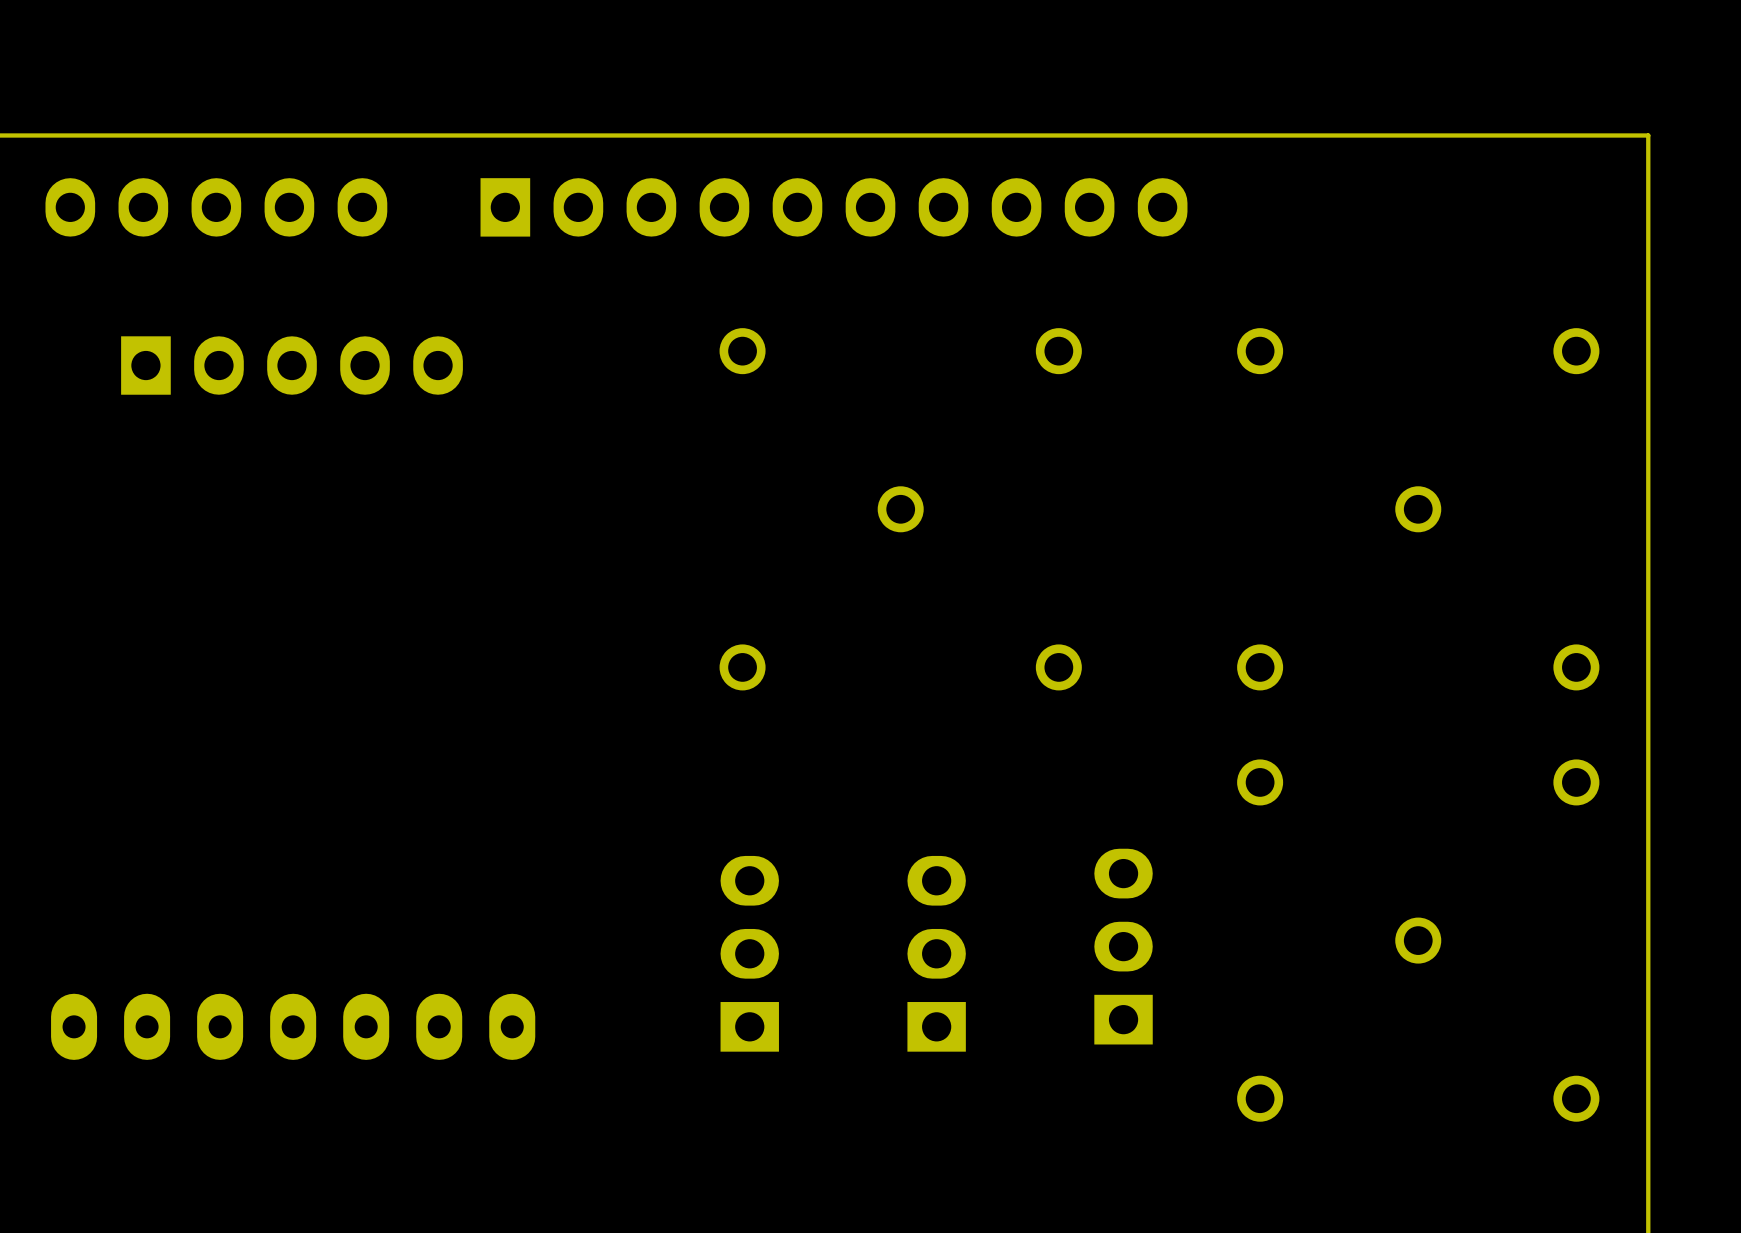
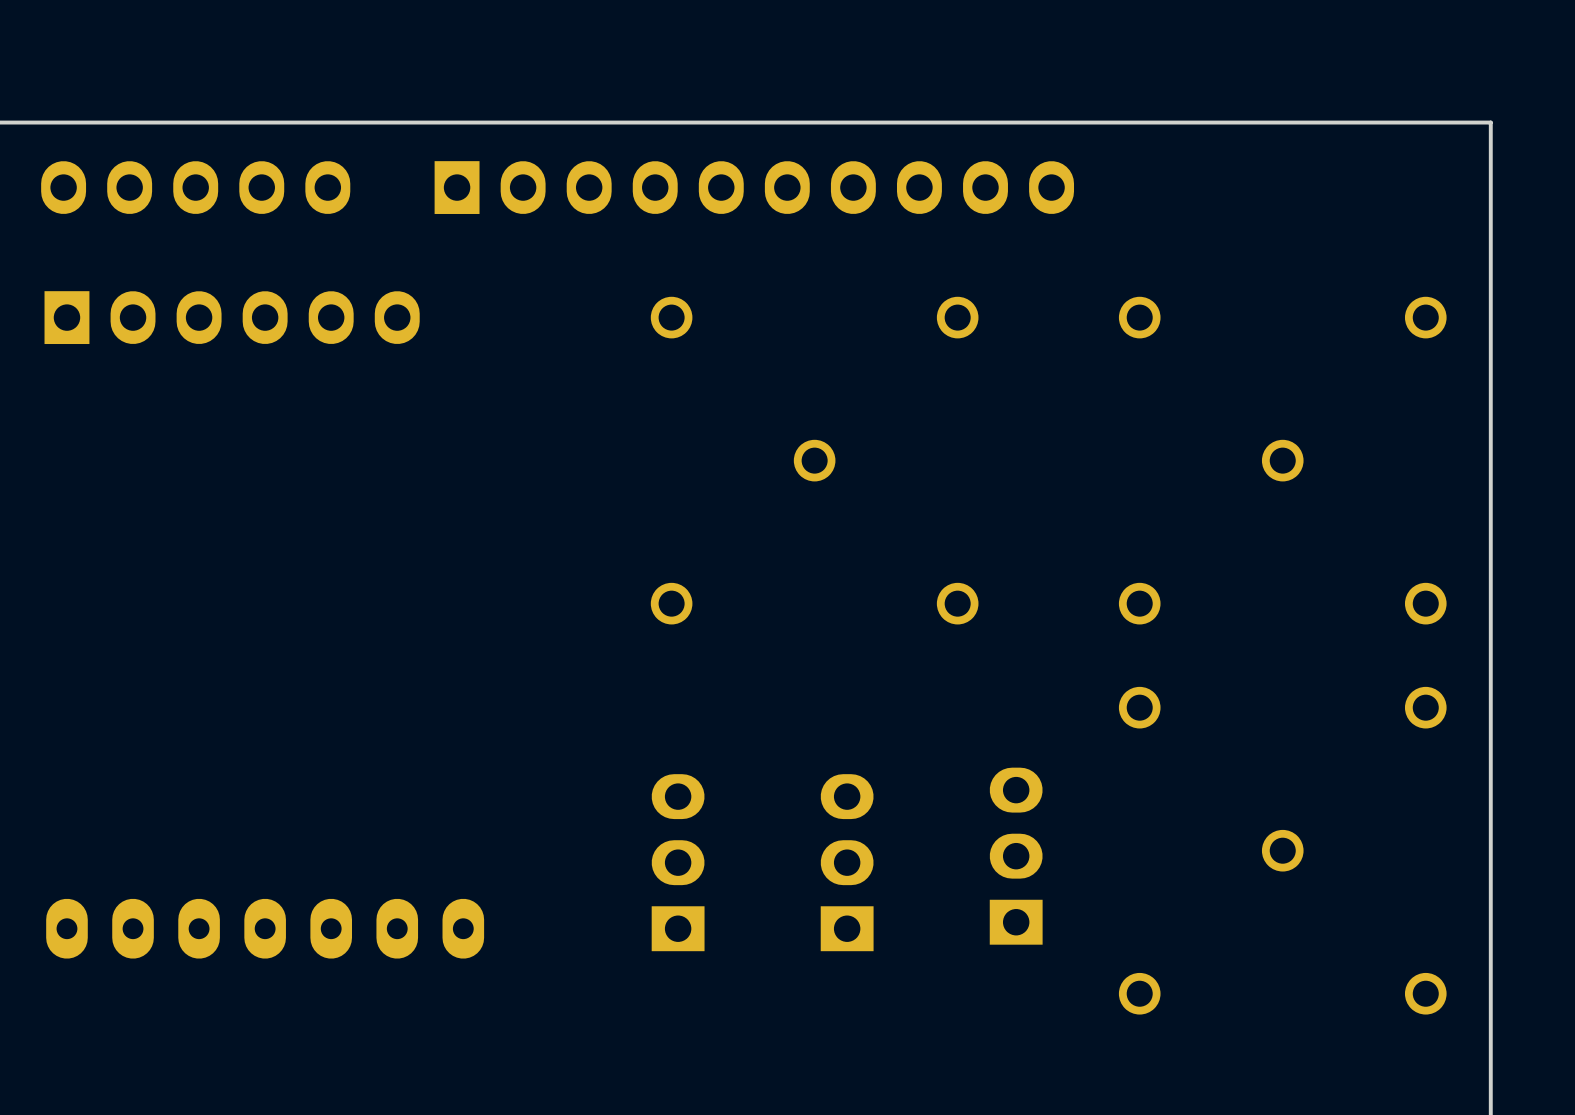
part: none -> (232, 317)
part: (292, 365) -> none

